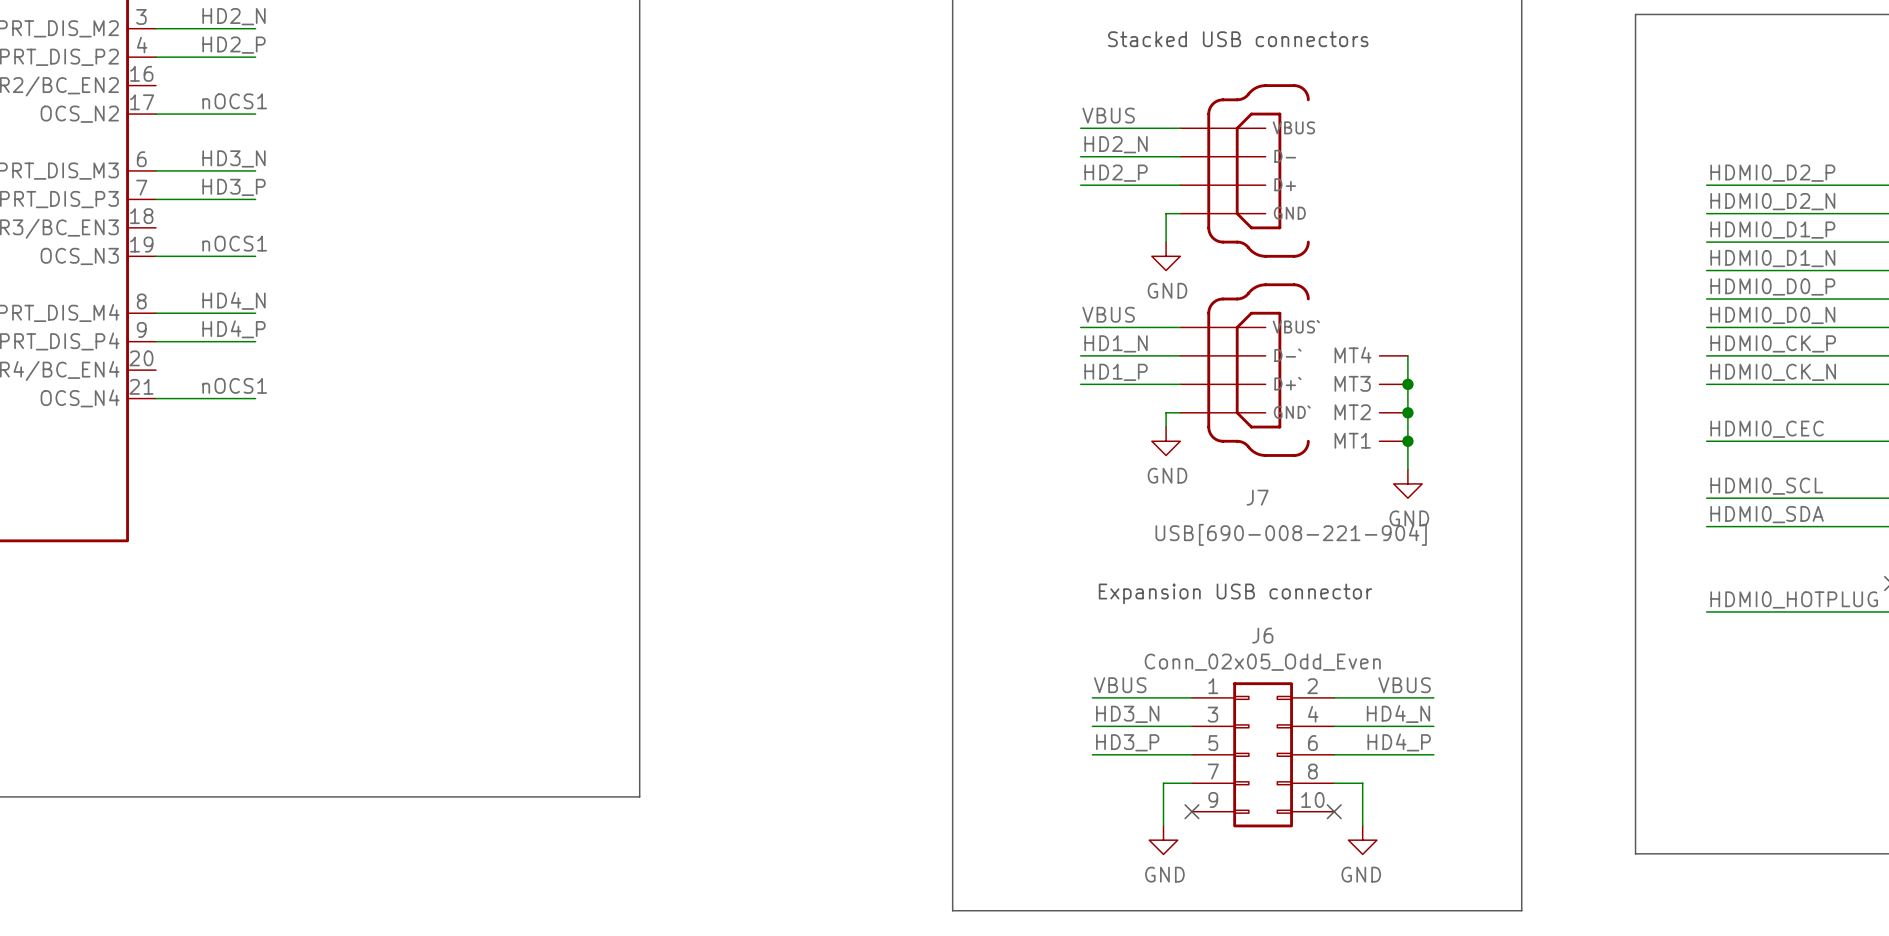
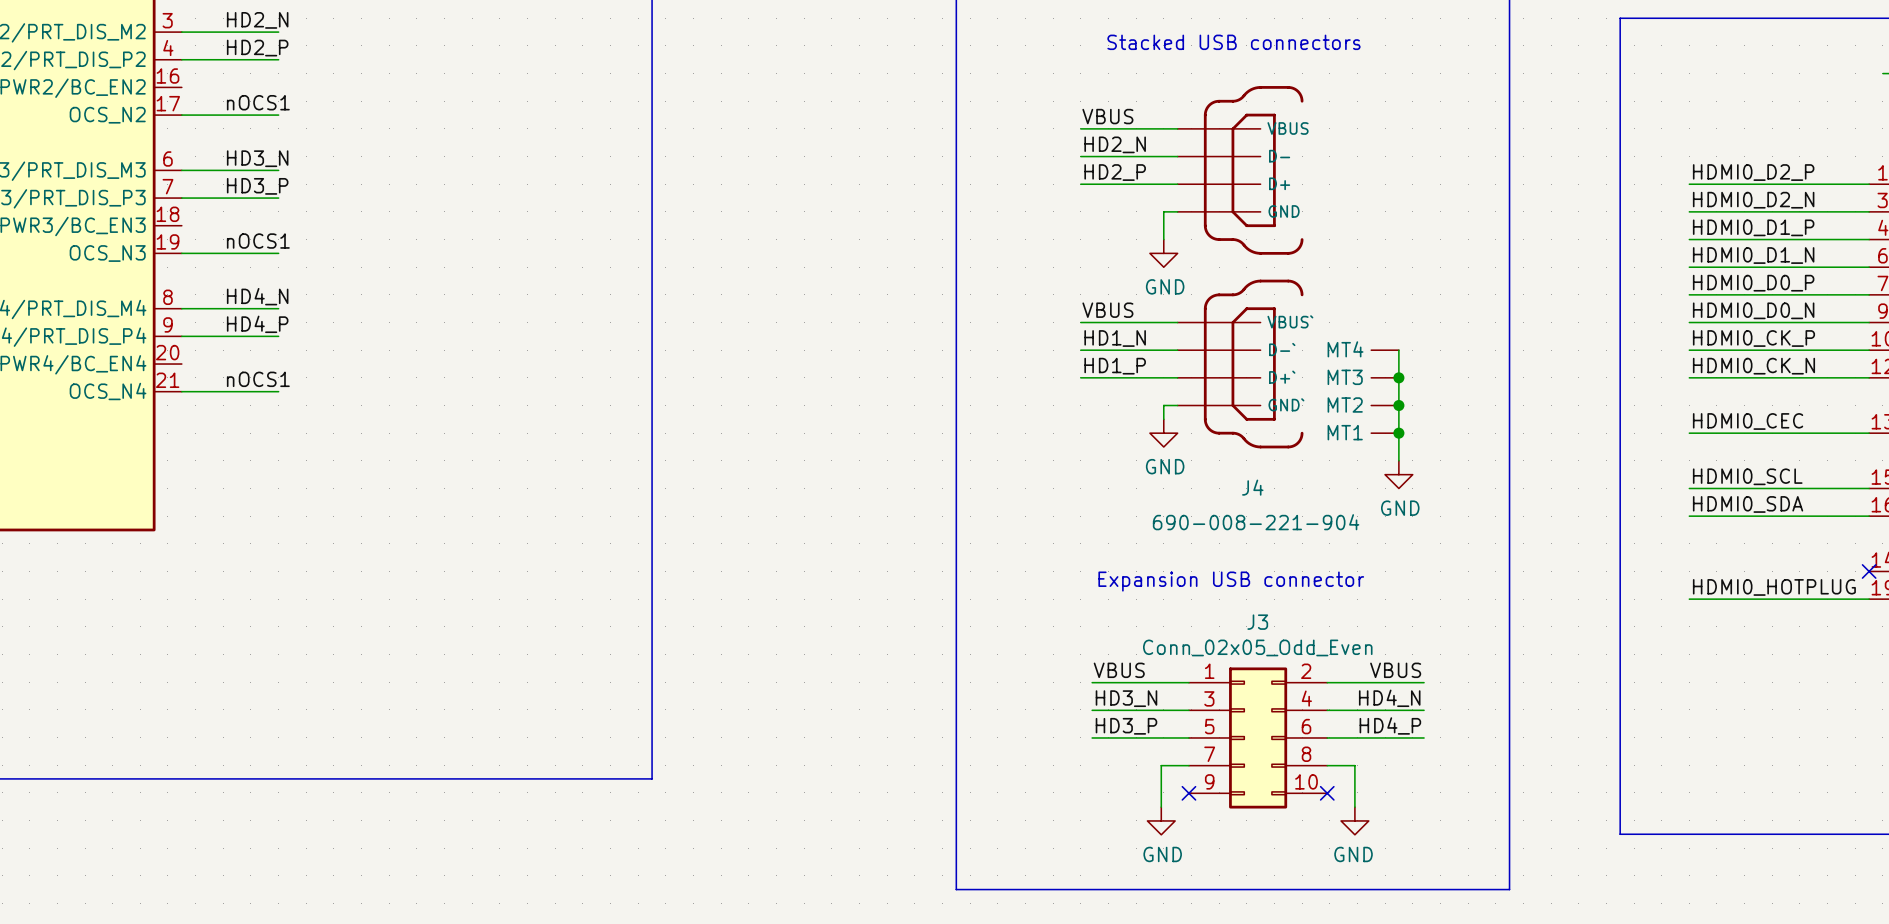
J7 name: J7 (1257, 497) -> J4 (1252, 487)
J7 value: USB[690-008-221-904] (1291, 534) -> 690-008-221-904 (1256, 522)
J6 name: J6 (1262, 635) -> J3 (1257, 622)

